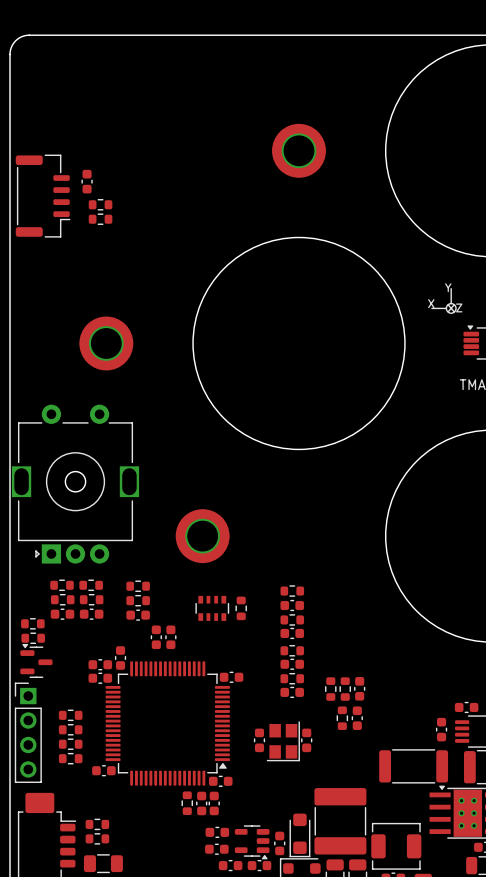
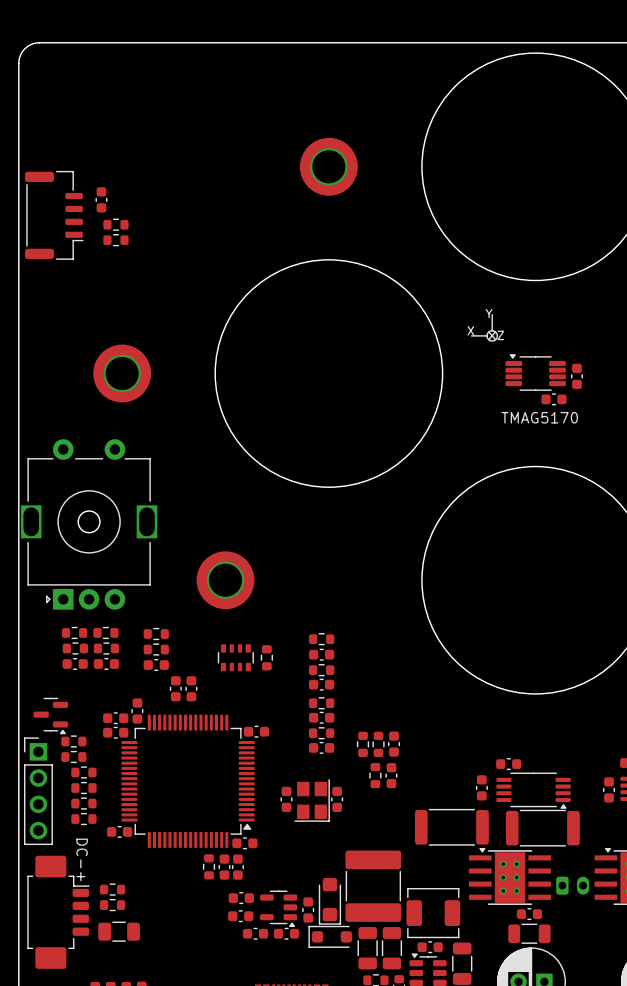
part: (32, 623) -> none
part: (33, 638) -> none
part rotation: 0° (36, 660) -> 180° (50, 716)
part: none -> (73, 741)
part: none -> (73, 757)
text: none -> DC-+ (82, 859)

